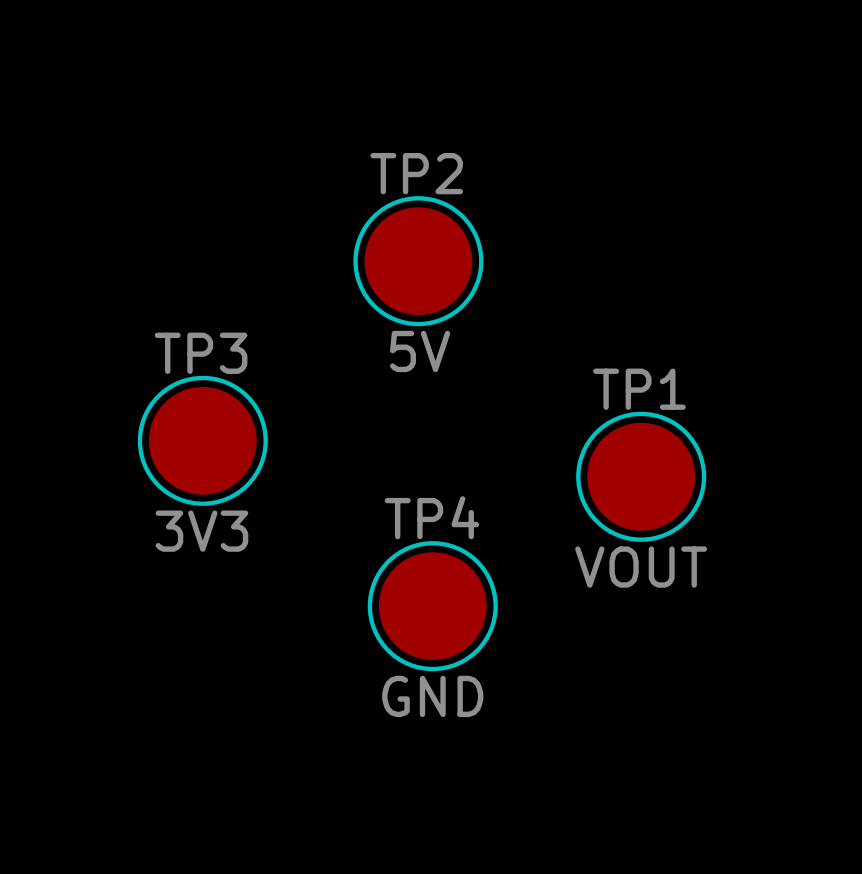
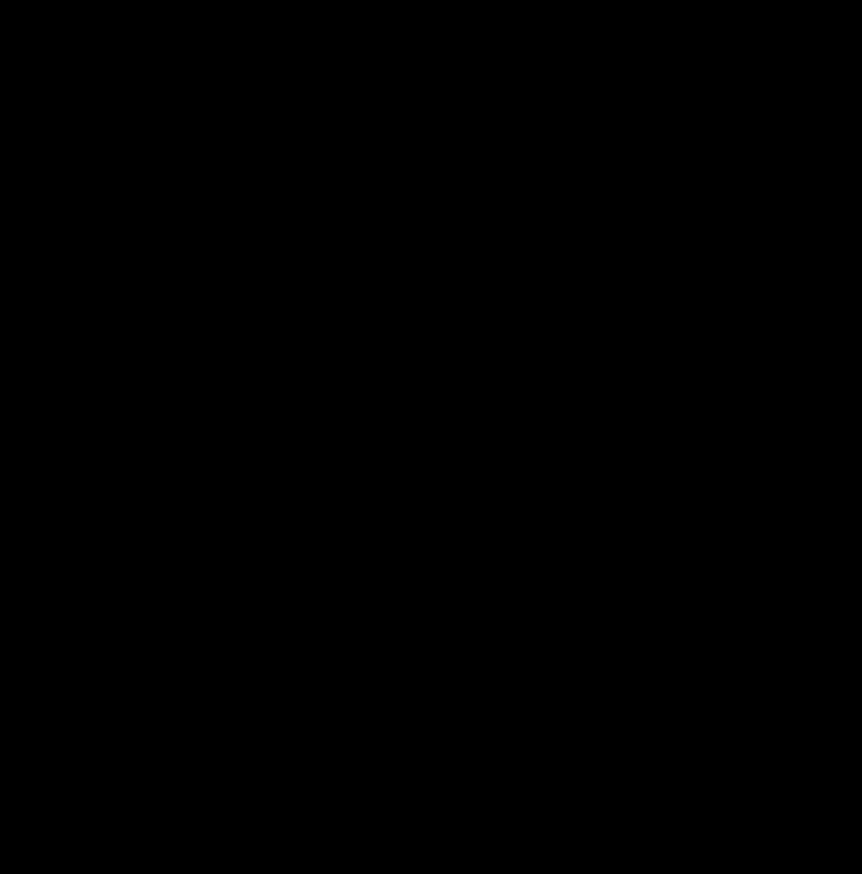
TP2: 5V (418, 261) -> none
TP3: 3V3 (202, 440) -> none
TP1: VOUT (641, 476) -> none
TP4: GND (432, 606) -> none

